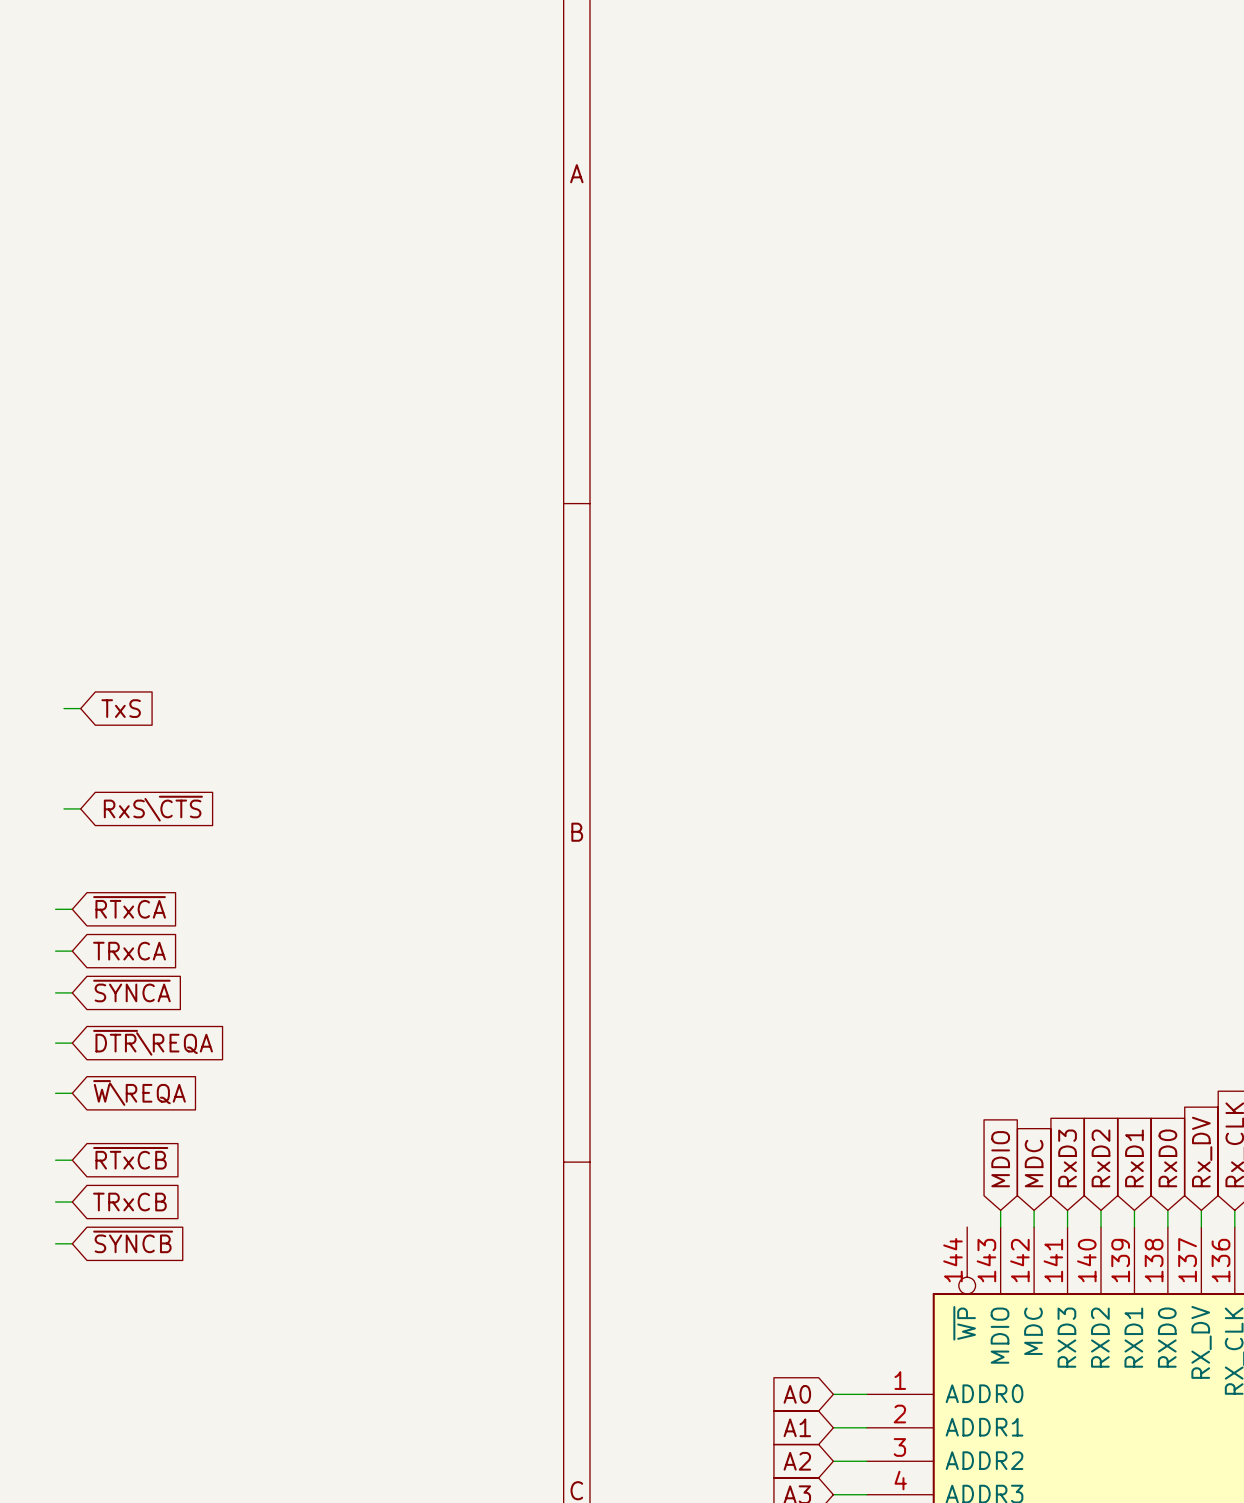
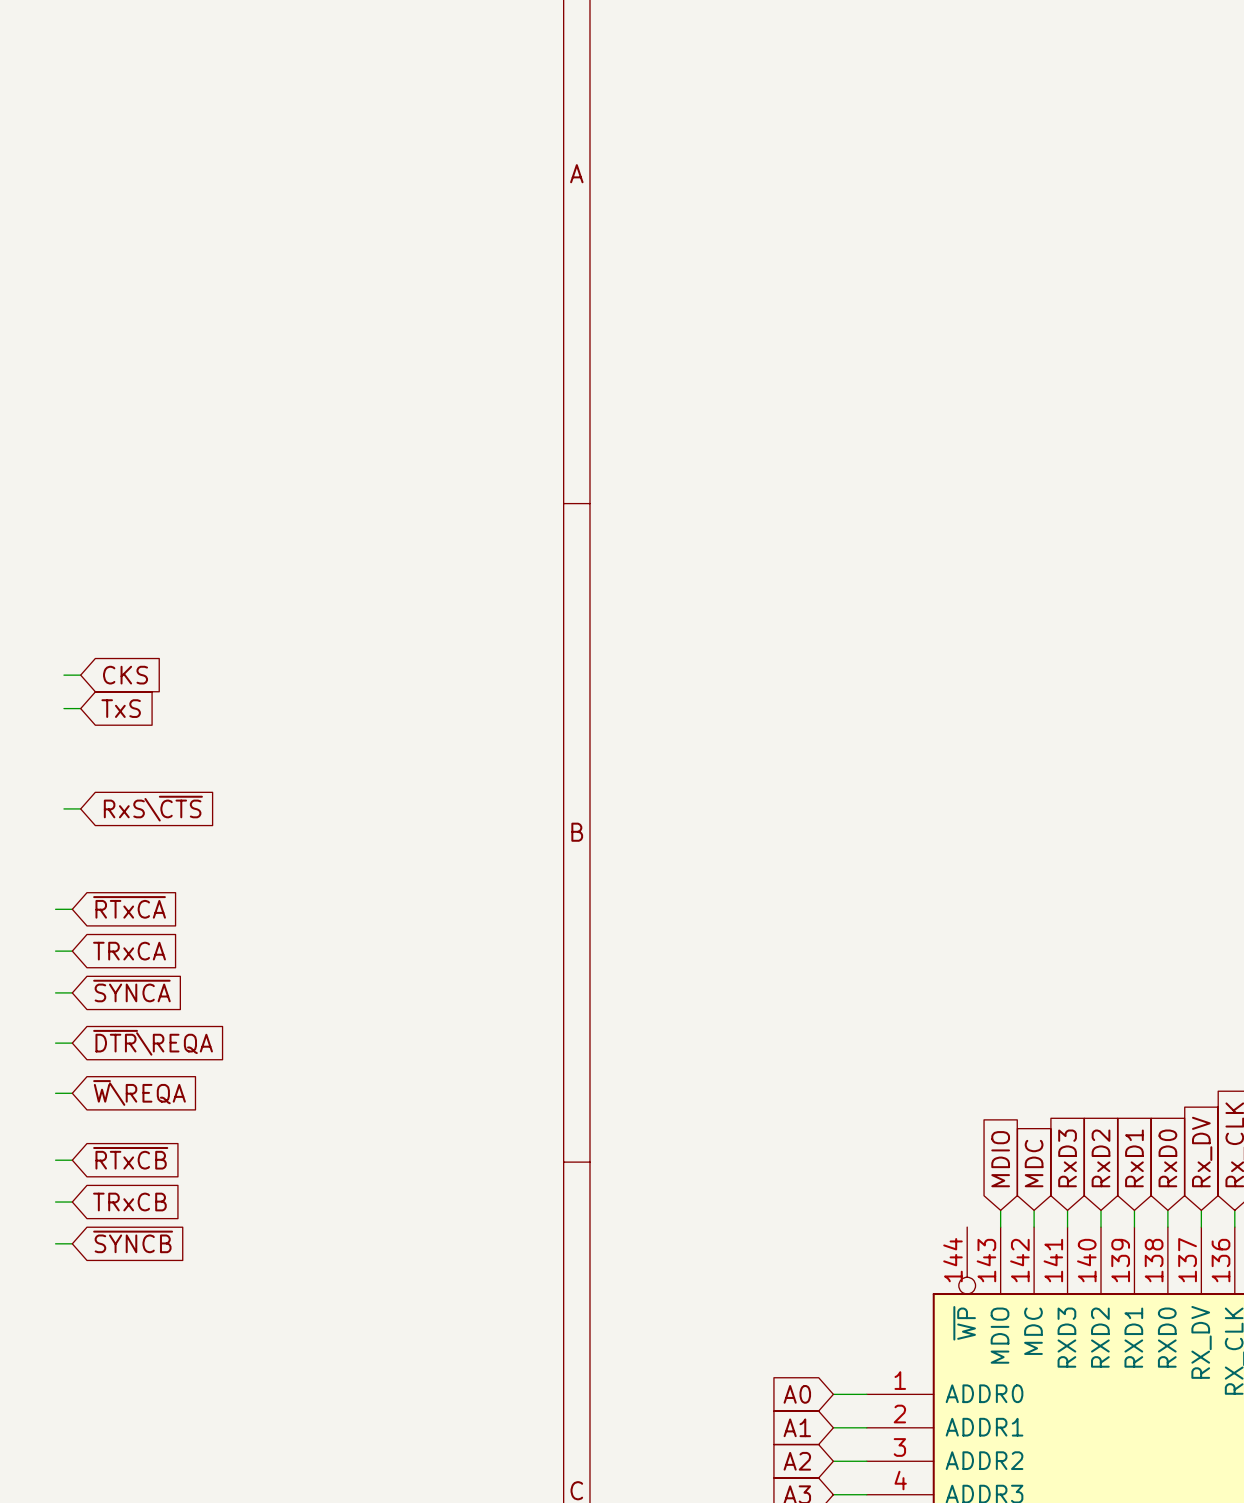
wire: none -> (63, 675) (80, 675)
global label: none -> CKS (125, 675)

